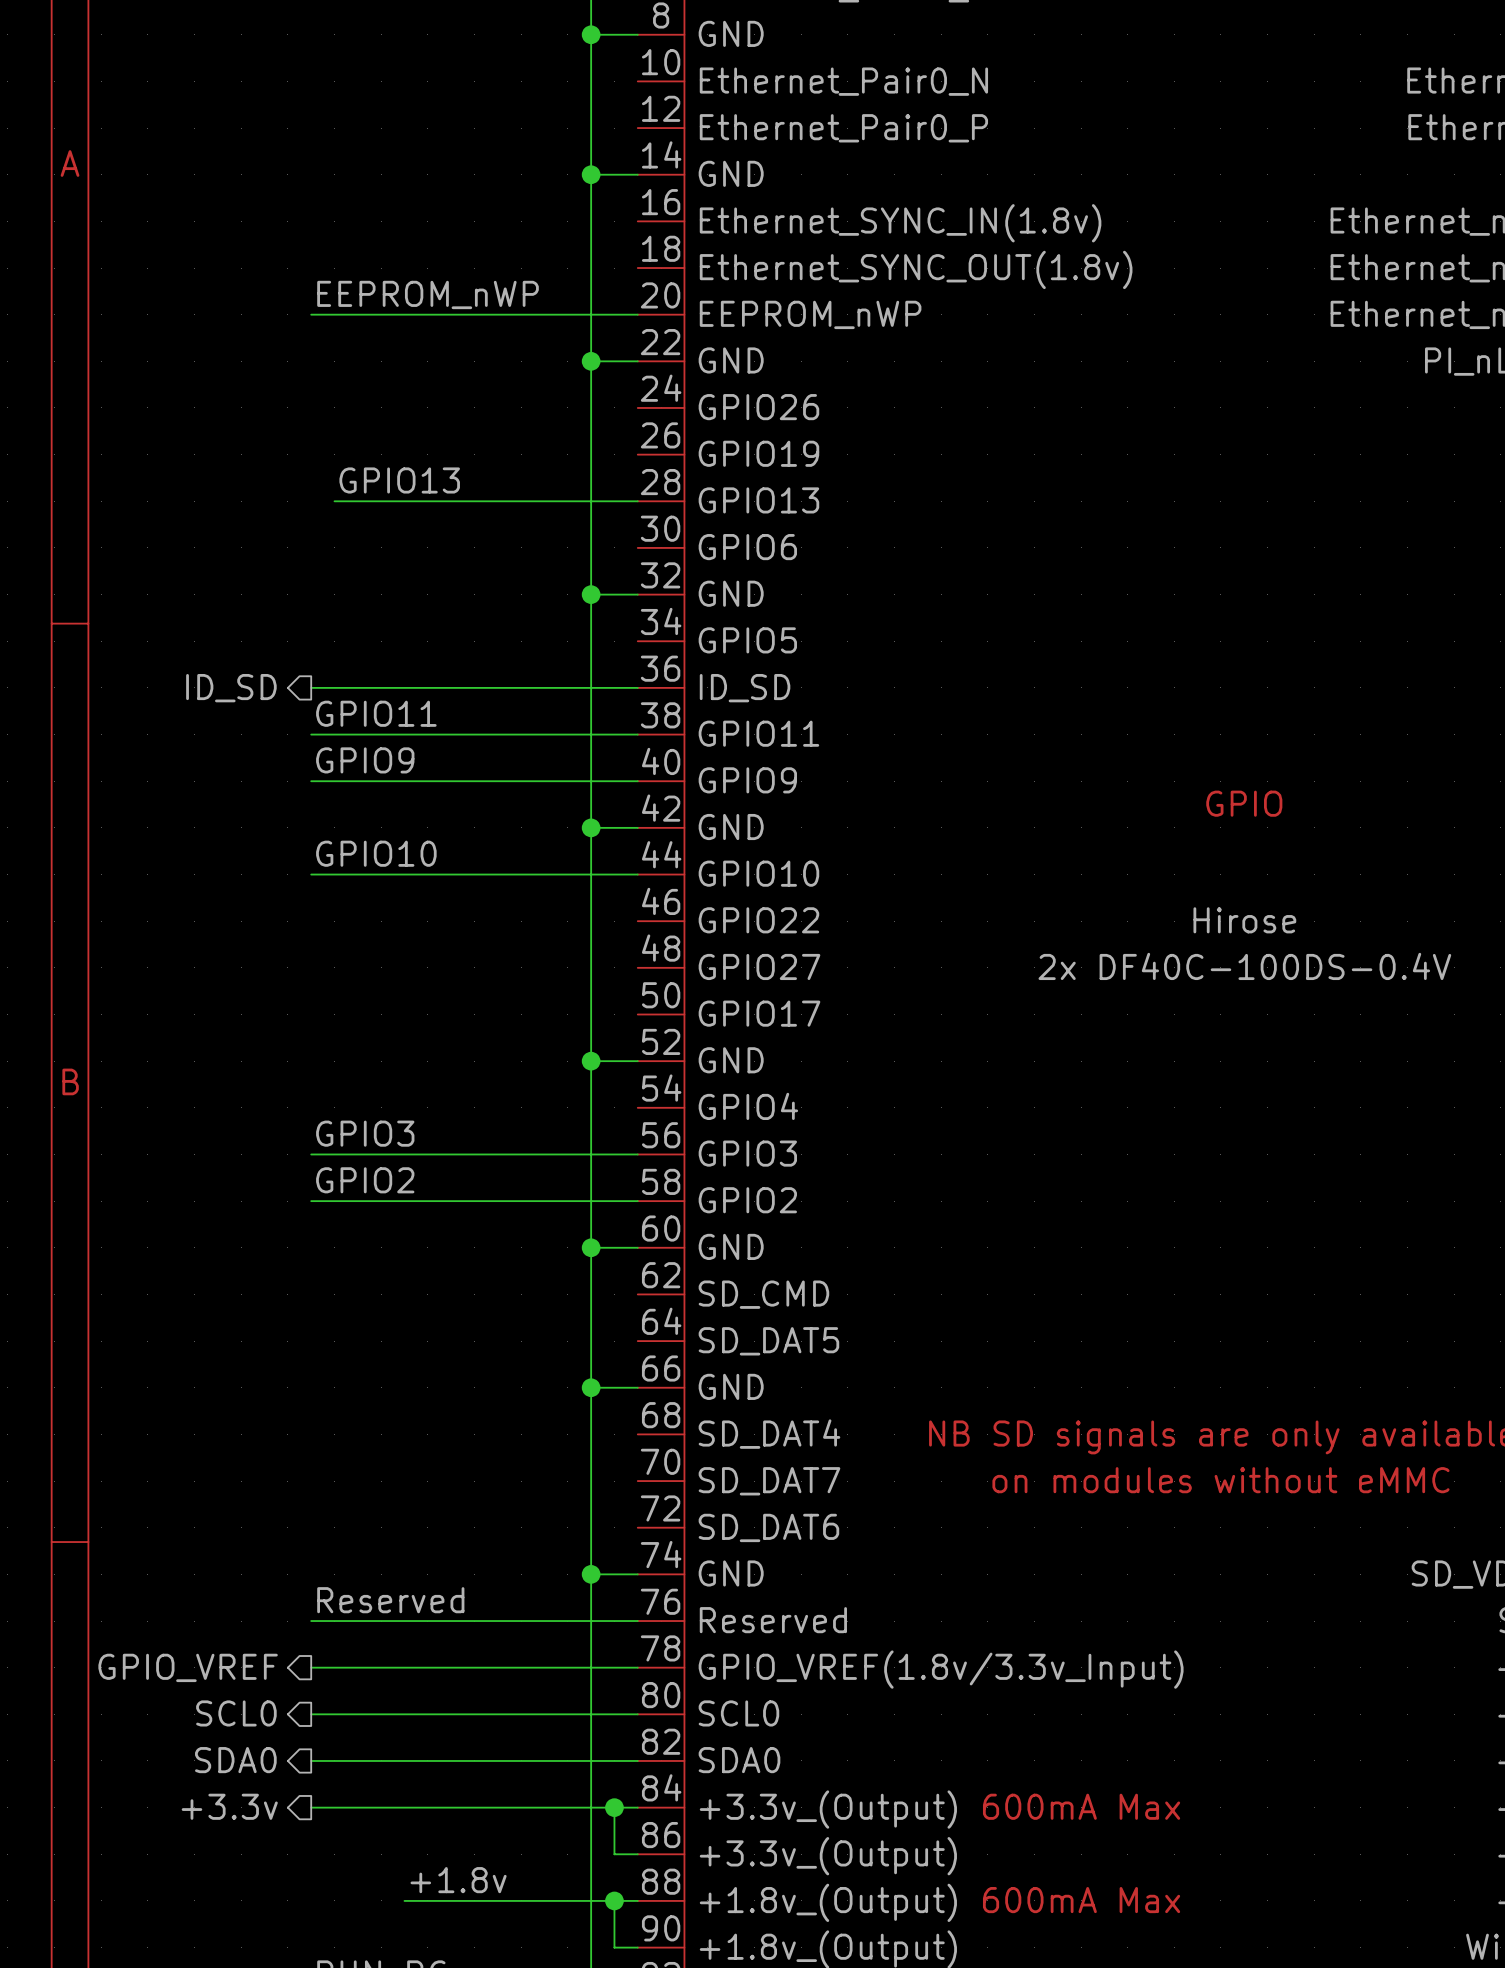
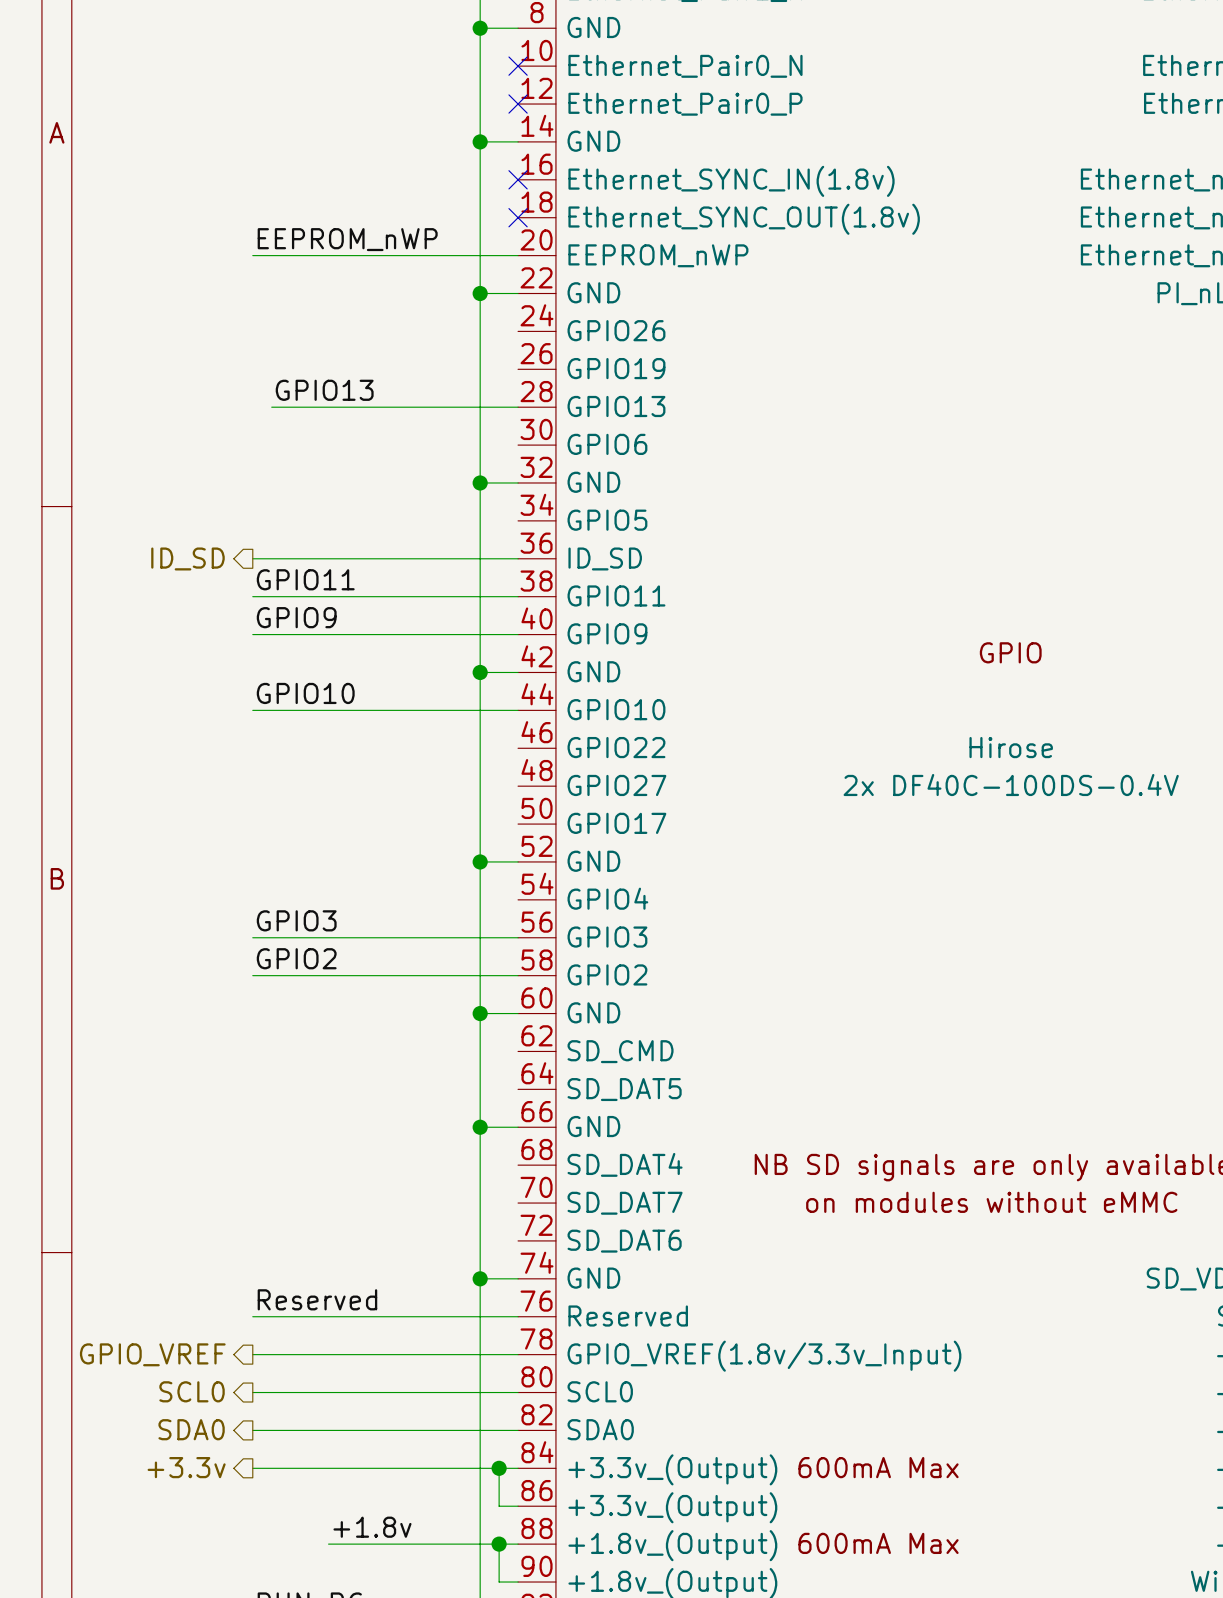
no-connect mark: none -> (518, 66)
no-connect mark: none -> (518, 104)
no-connect mark: none -> (518, 179)
no-connect mark: none -> (518, 217)

